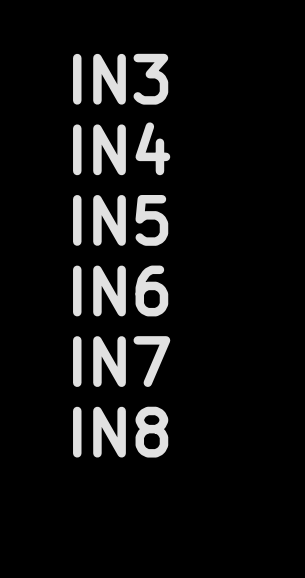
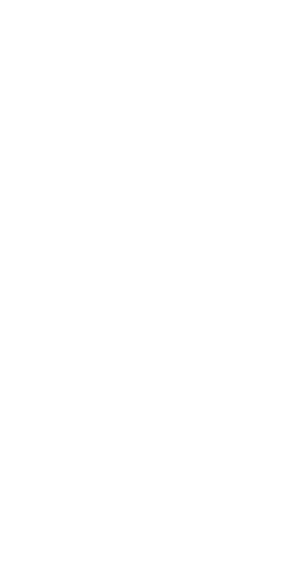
text: IN3 (120, 79) -> none
text: IN4 (121, 148) -> none
text: IN5 (120, 220) -> none
text: IN6 (120, 290) -> none
text: IN7 (121, 361) -> none
text: IN8 (120, 432) -> none

